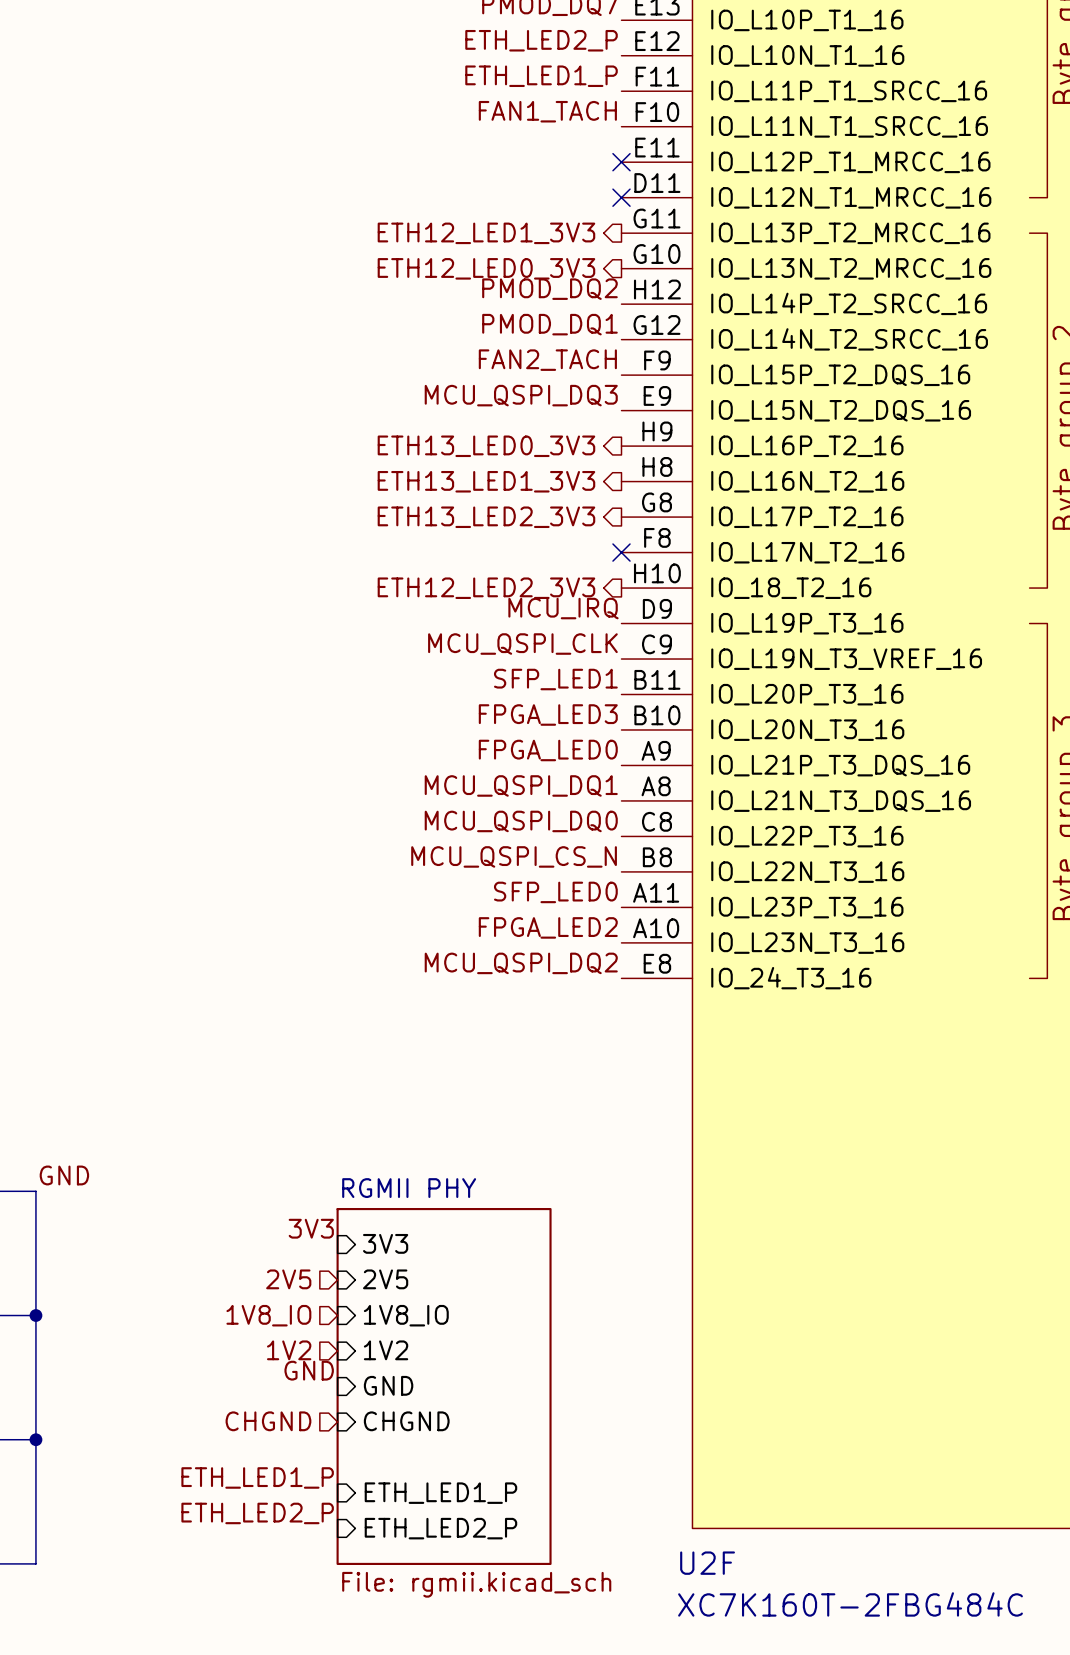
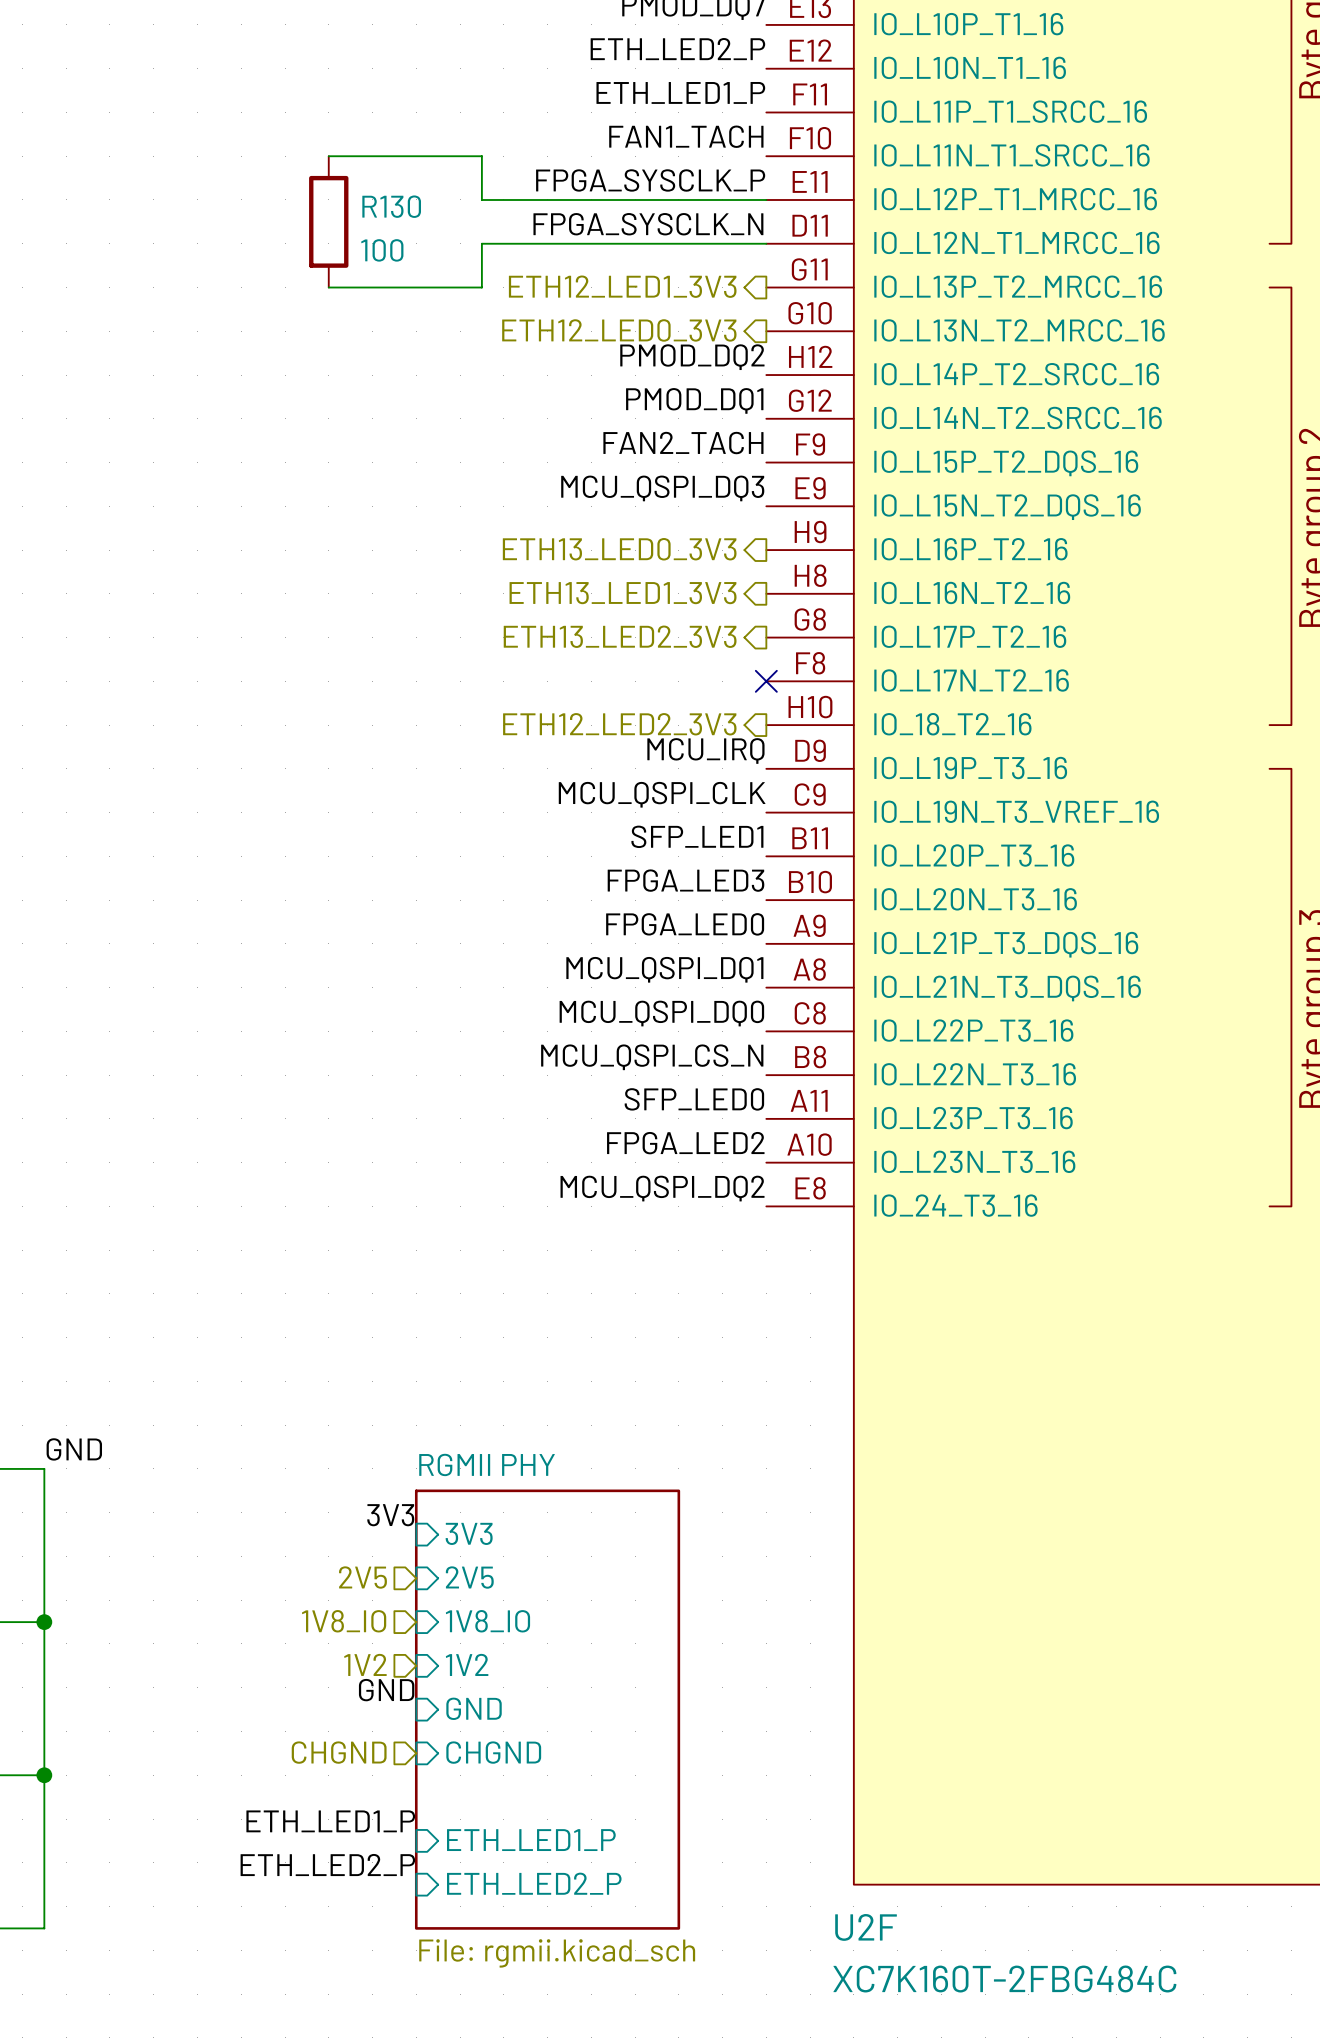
wire: none -> (328, 156) (481, 156) (481, 199) (766, 199)
label: none -> FPGA_SYSCLK_P (650, 180)
no-connect mark: (621, 162) -> none
R130: none -> 100 (328, 221)
label: none -> FPGA_SYSCLK_N (648, 224)
wire: none -> (766, 243) (481, 243) (481, 287) (328, 287)
no-connect mark: (621, 197) -> none

